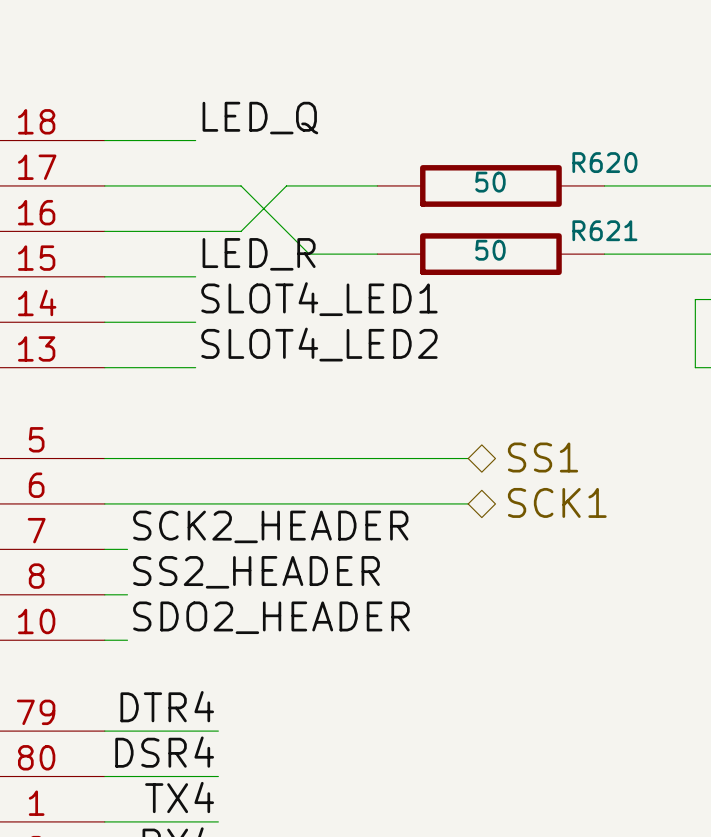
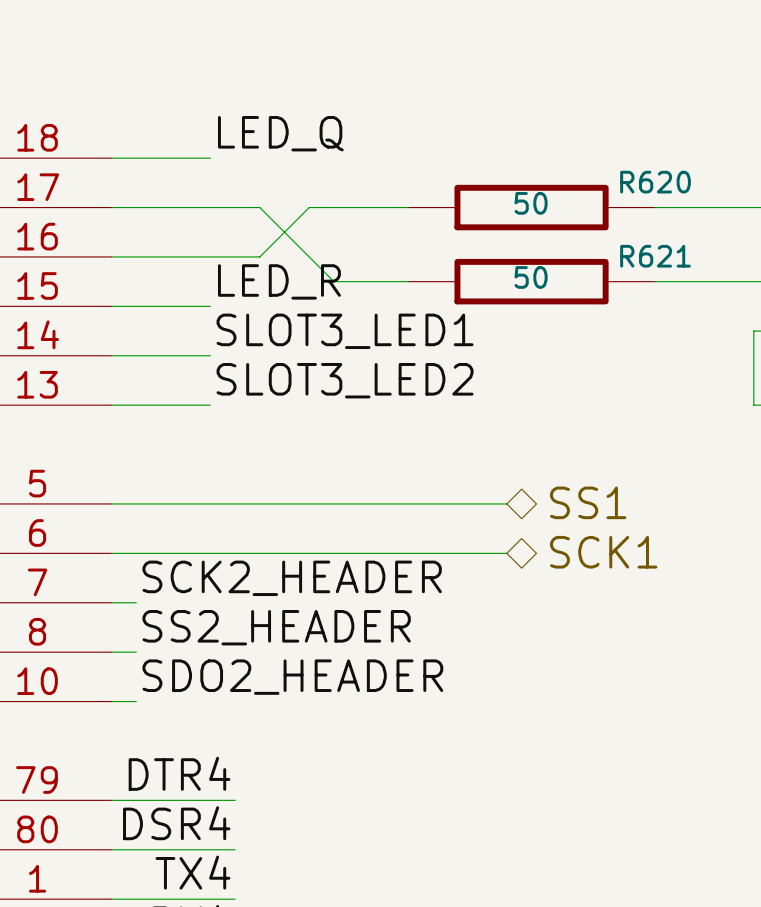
label: SLOT4_LED1 (319, 299) -> SLOT3_LED1 (345, 331)
label: SLOT4_LED2 (319, 344) -> SLOT3_LED2 (345, 380)

